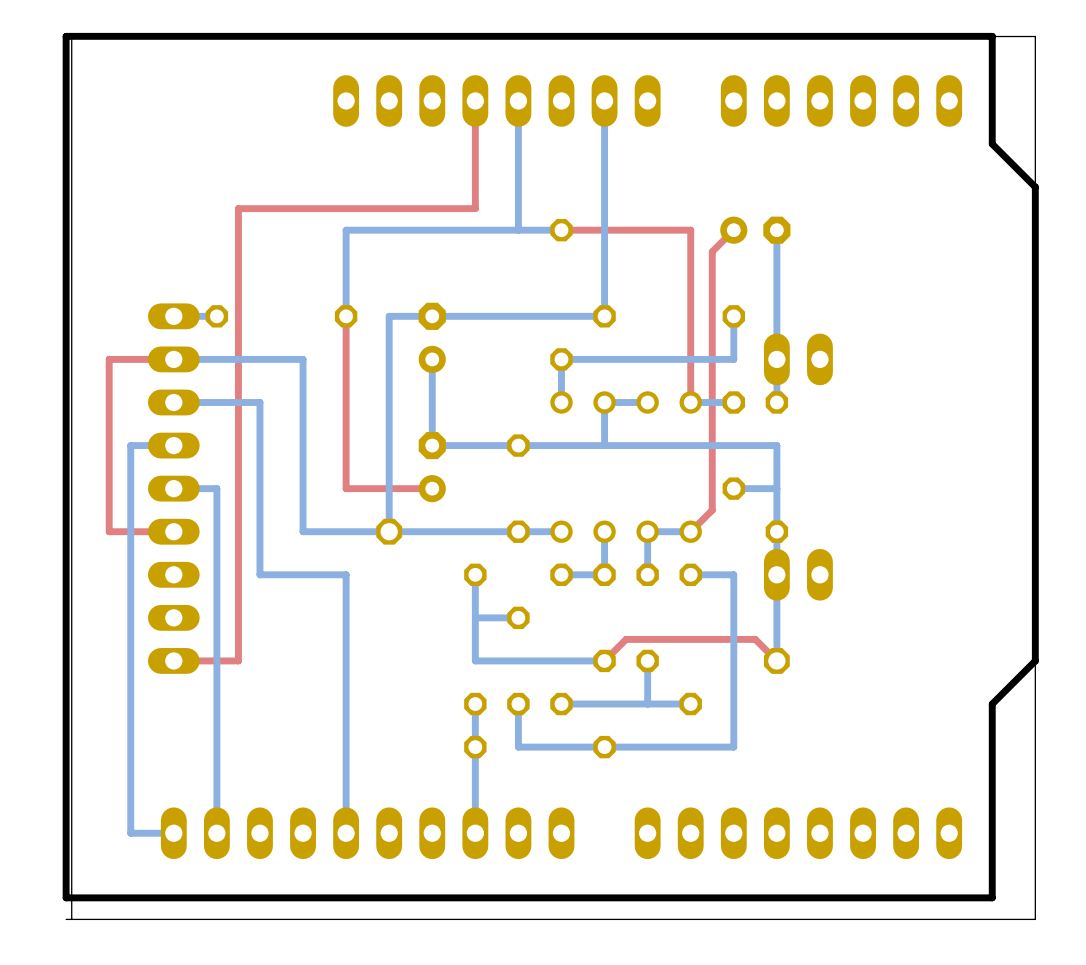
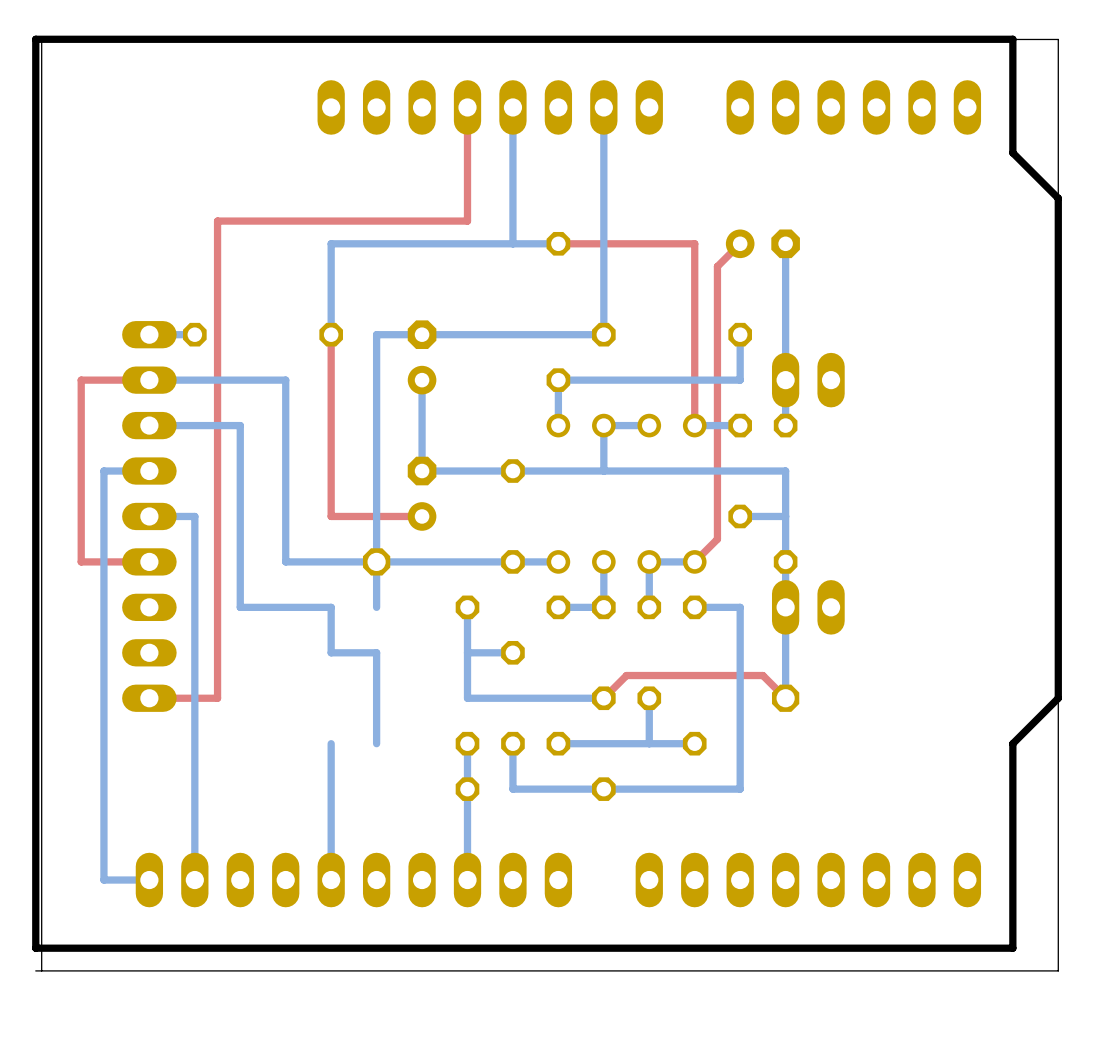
bottom track: none -> (376, 561) (376, 607)
bottom track: (346, 617) (346, 704) -> (331, 652) (376, 652) (376, 743)

